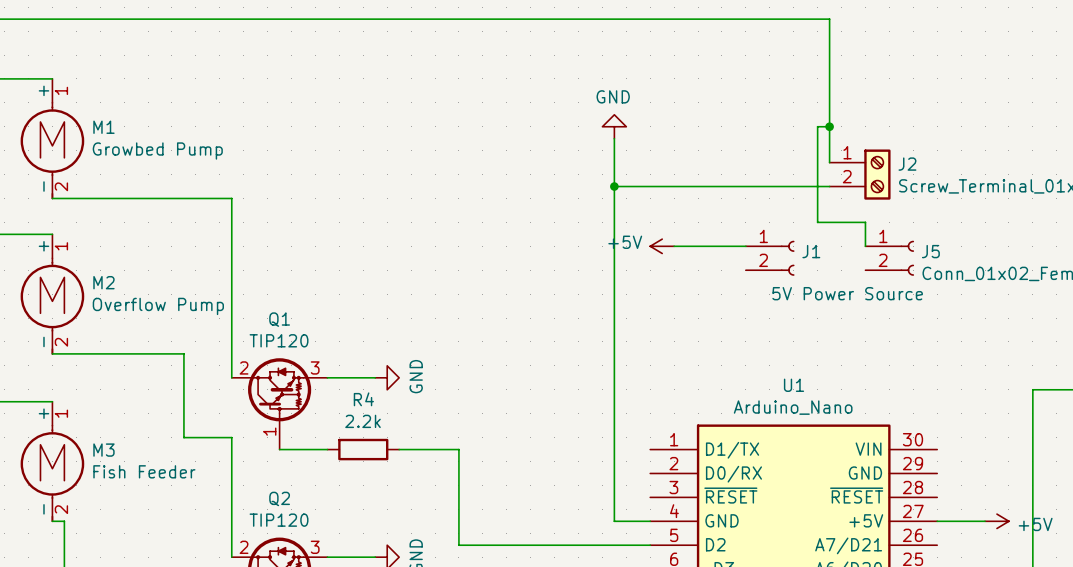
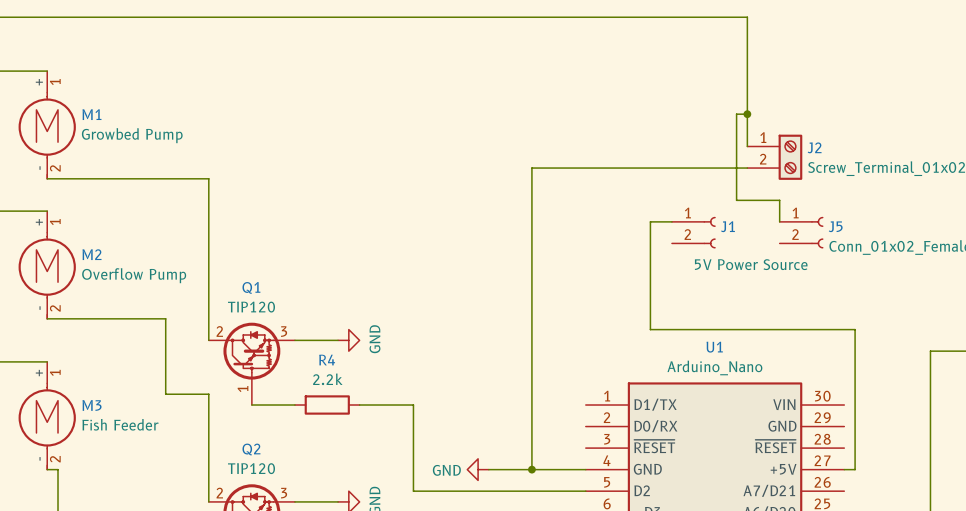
power symbol: GND (614, 126) -> none
wire: (614, 138) (614, 521) -> (488, 469) (553, 469)
wire: none -> (553, 168) (531, 168) (531, 469)
junction: (614, 186) -> none
power symbol: +5V (662, 246) -> none
wire: (674, 246) (721, 246) -> none
power symbol: none -> GND (478, 469)
junction: none -> (531, 469)
wire: (949, 521) (985, 521) -> (855, 469) (855, 329) (650, 329) (650, 221)
power symbol: +5V (996, 521) -> none

